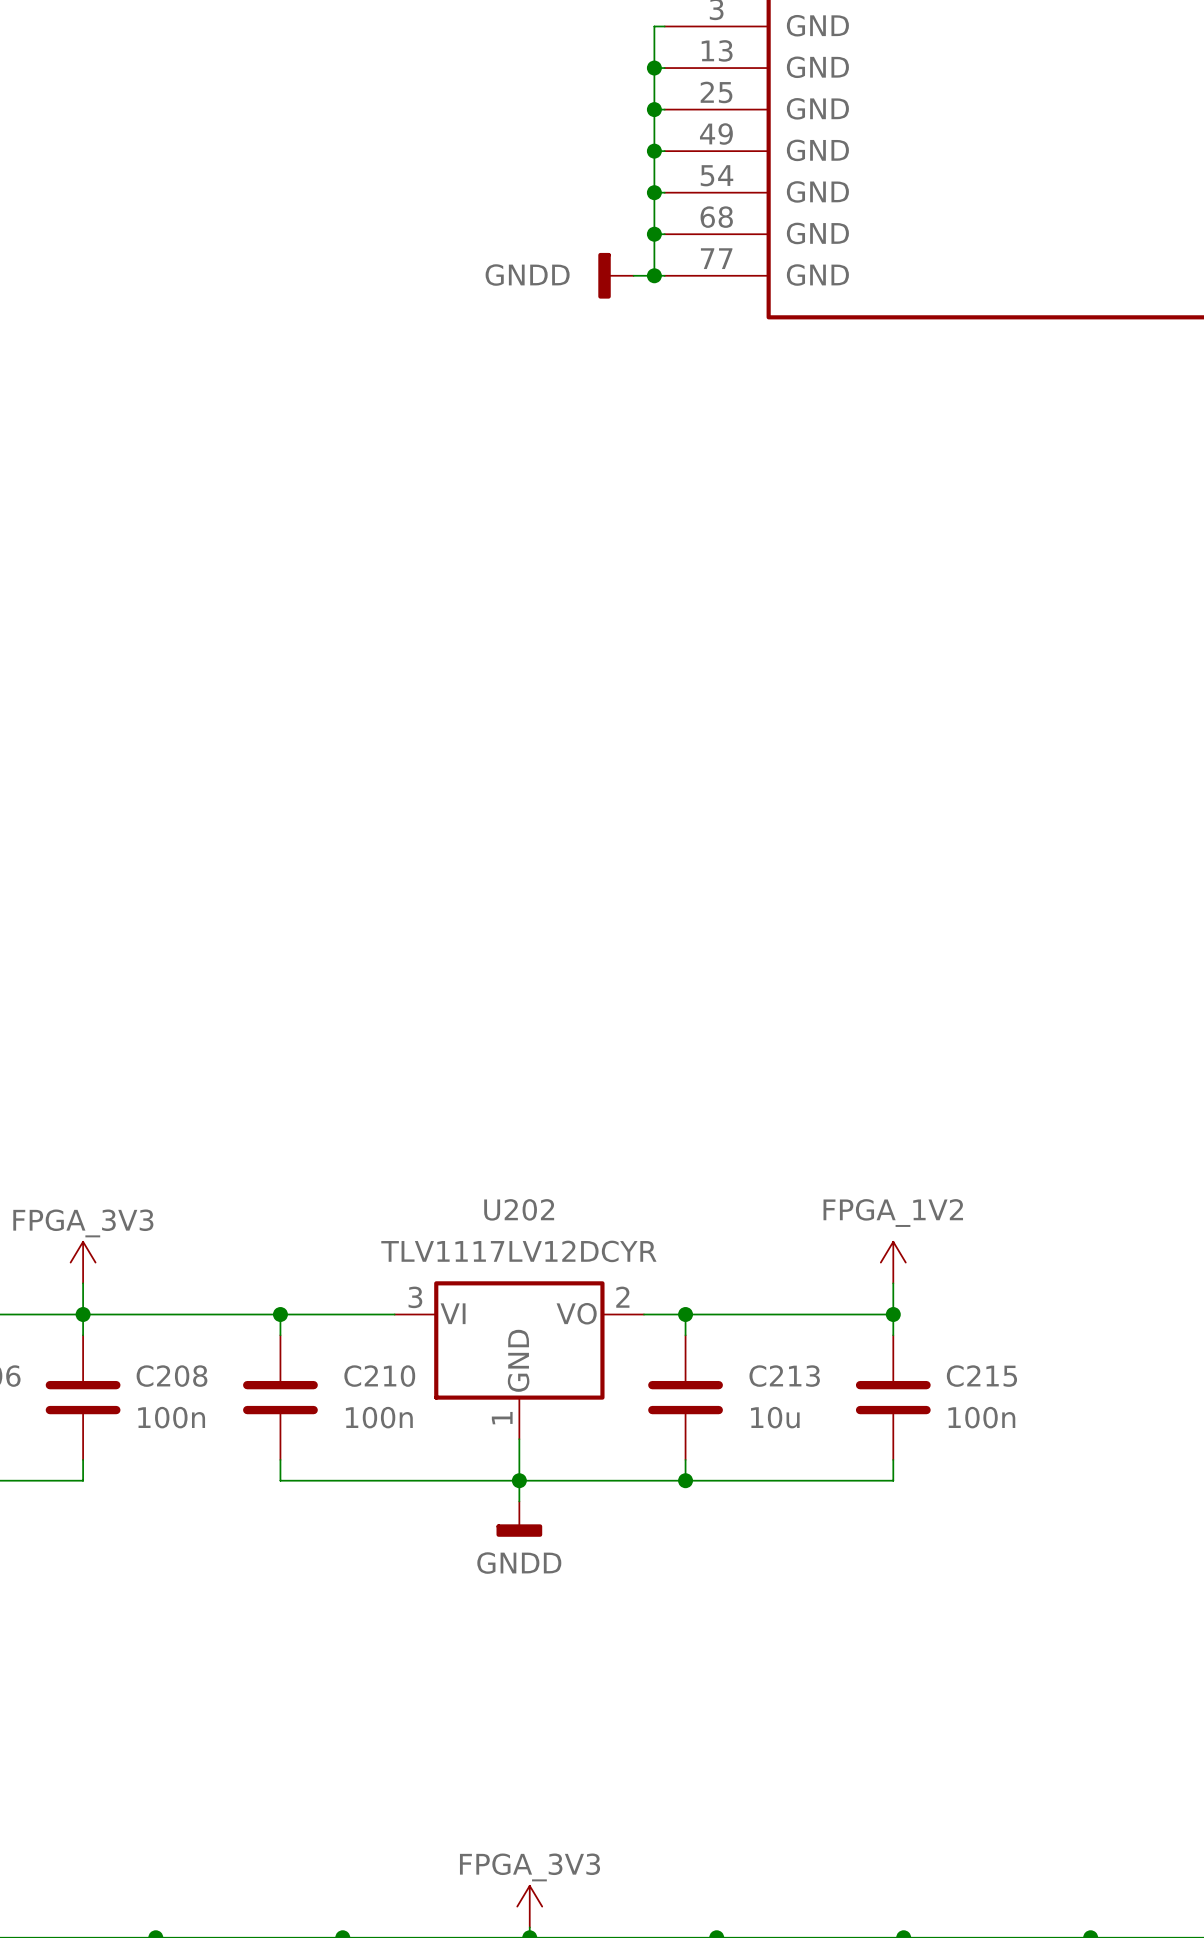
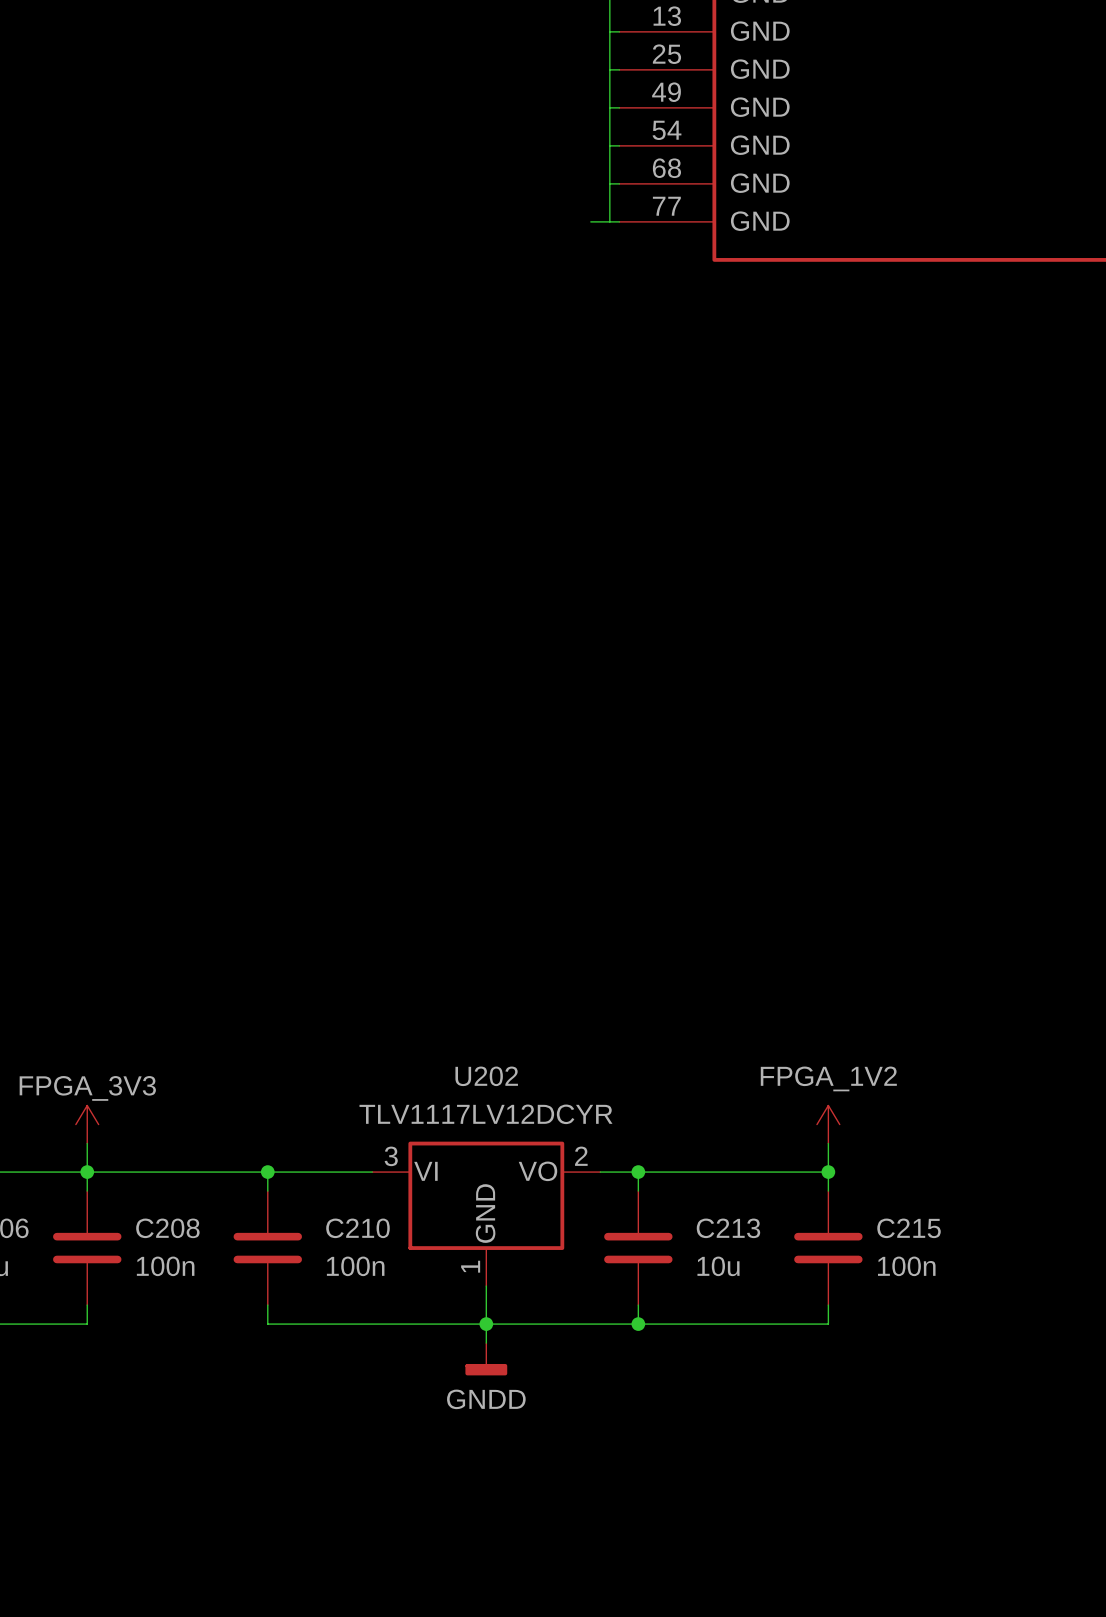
junction: (654, 68) -> none
junction: (654, 109) -> none
junction: (654, 151) -> none
junction: (654, 192) -> none
junction: (654, 234) -> none
power symbol: GNDD (615, 275) -> none
junction: (654, 275) -> none

